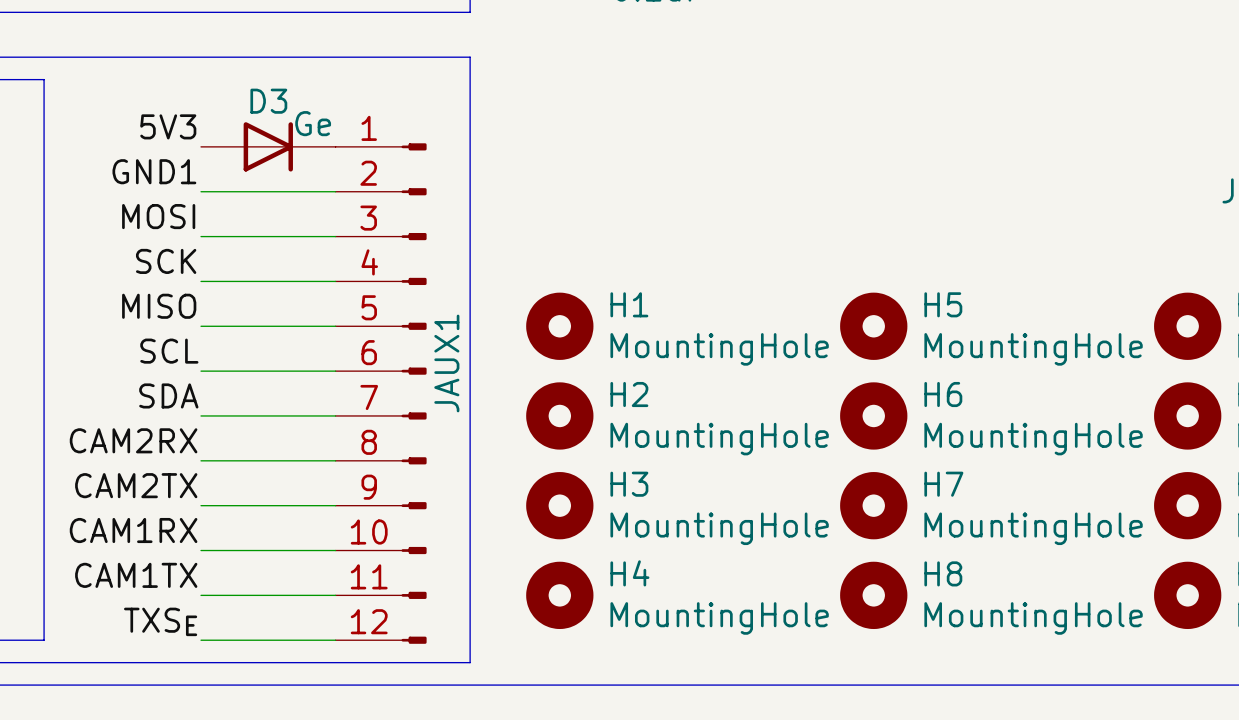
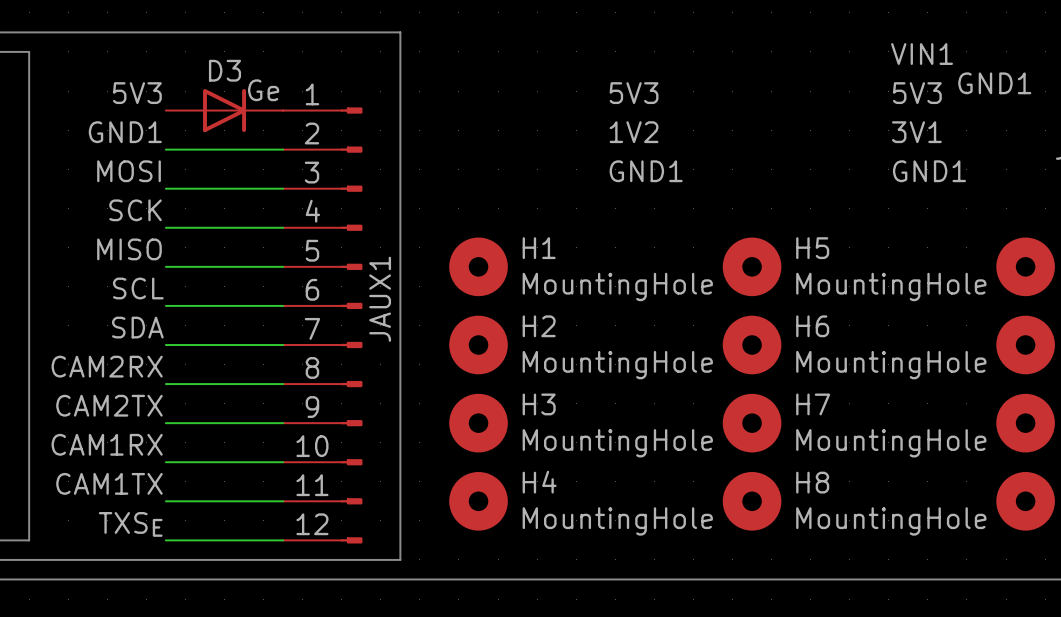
label: none -> VIN1 (922, 54)
label: none -> GND1 (994, 83)
label: none -> 5V3 (634, 93)
label: none -> 5V3 (917, 93)
label: none -> 1V2 (634, 132)
label: none -> 3V1 (916, 132)
label: none -> GND1 (646, 171)
label: none -> GND1 (929, 171)

